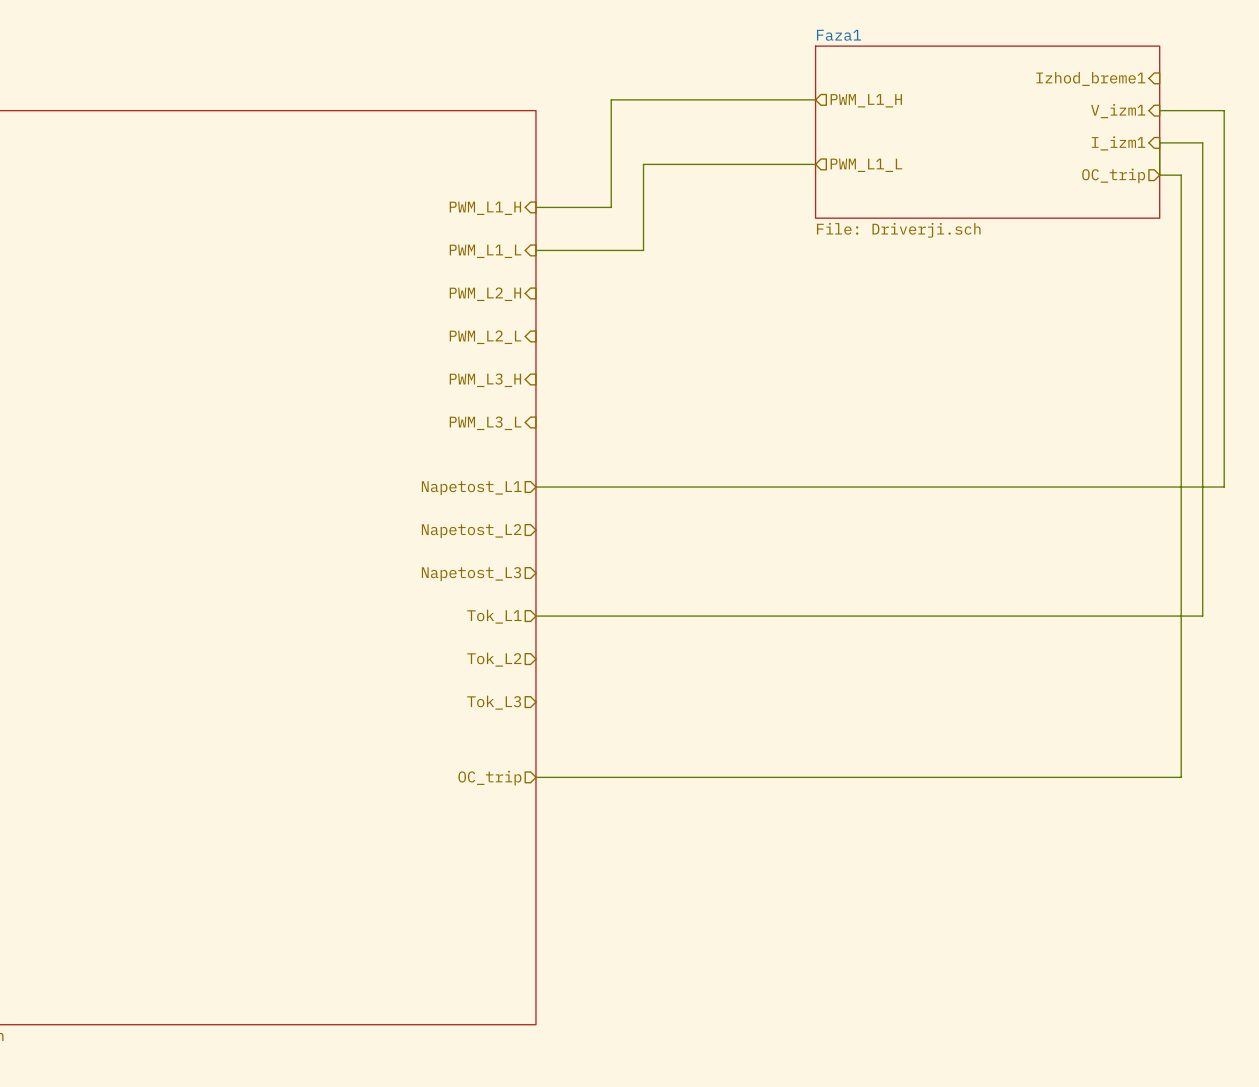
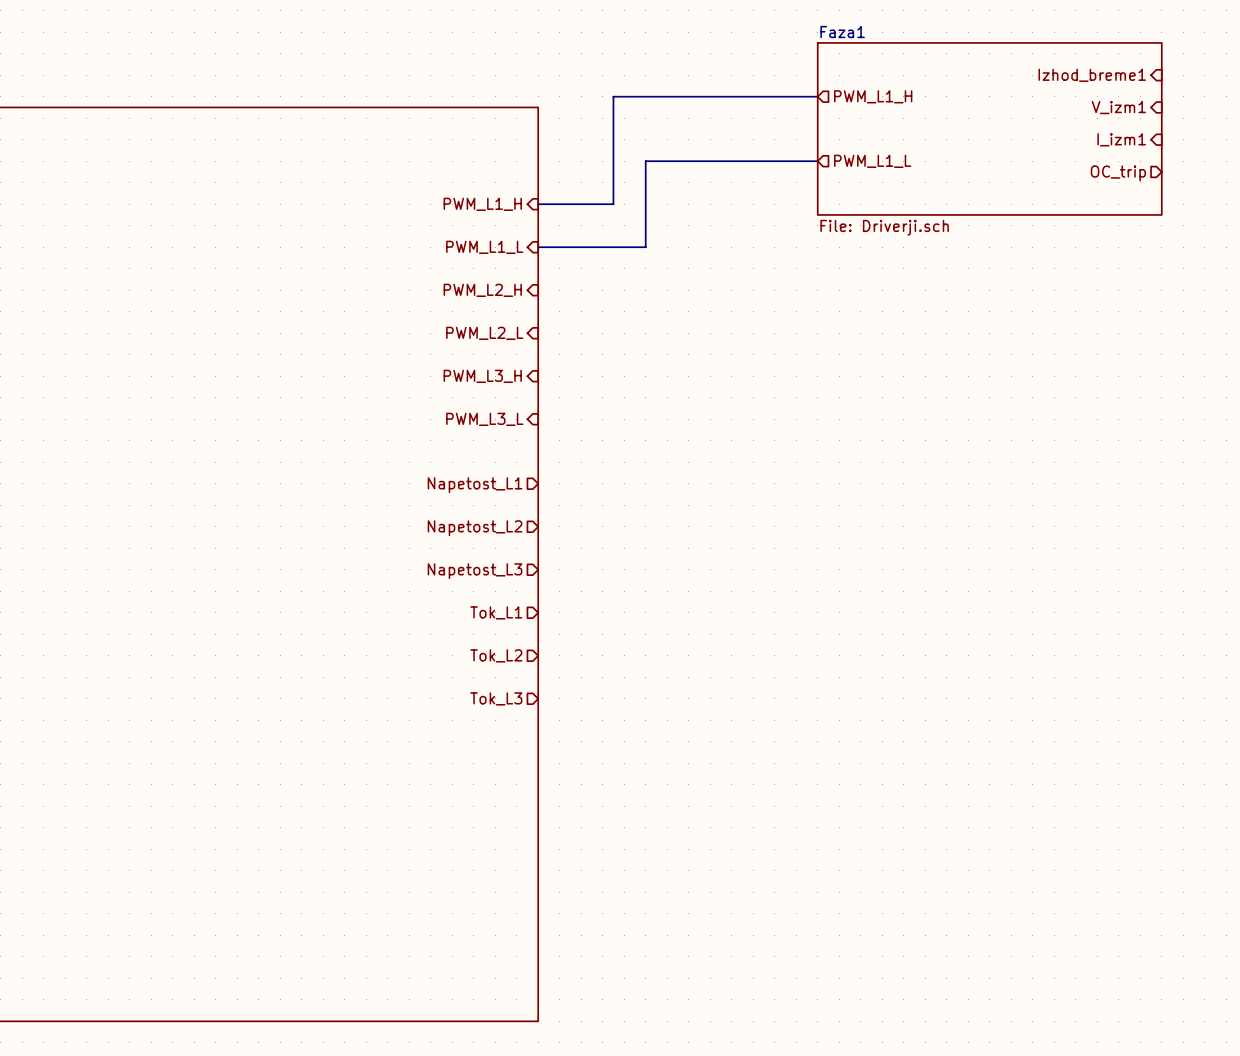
wire: (1159, 110) (1224, 110) (1224, 487) (535, 487) -> none
wire: (535, 616) (1202, 616) (1202, 142) (1159, 142) (1159, 175) (1181, 175) (1181, 777) (535, 777) -> none
hierarchical label: OC_trip (489, 778) -> none

